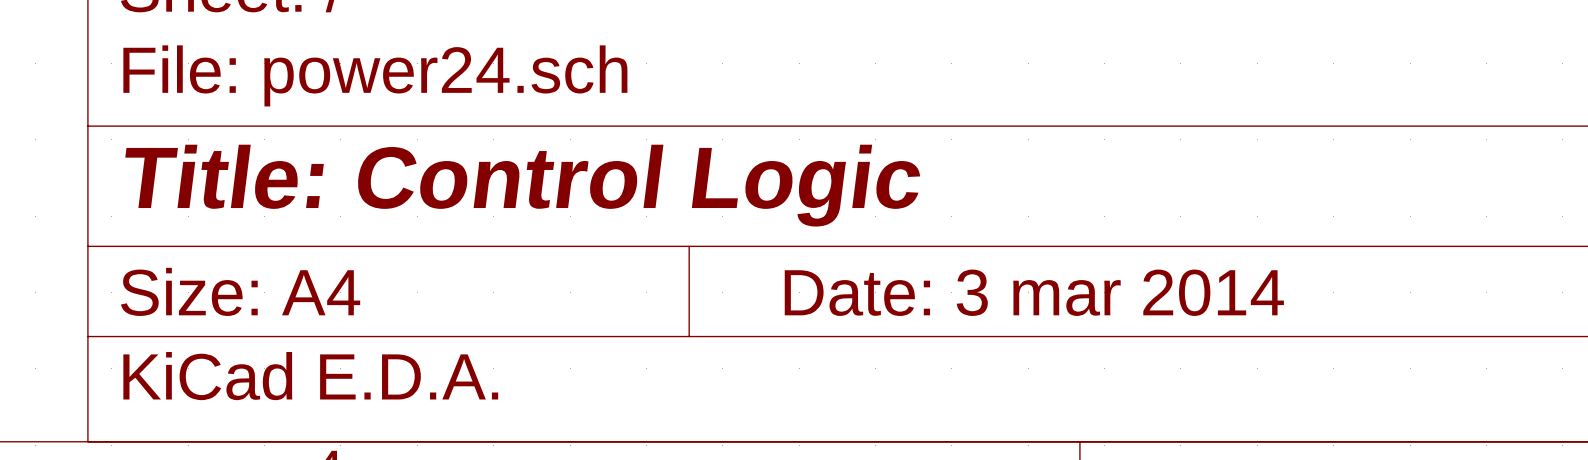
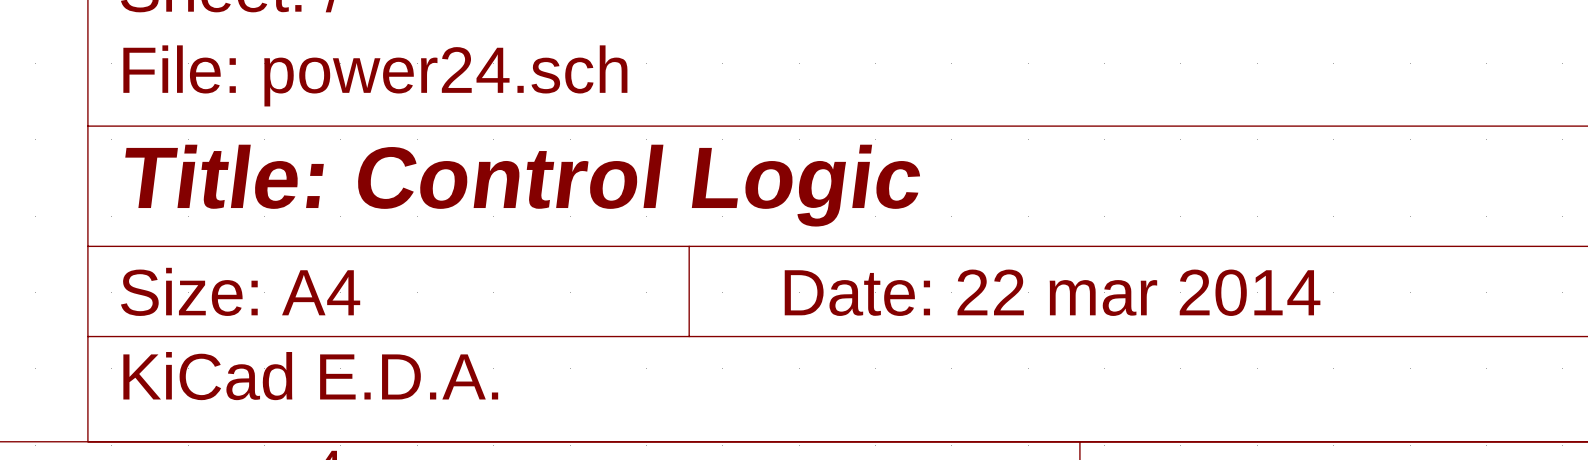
title block: Date: 3 mar 2014 (1034, 292) -> Date: 22 mar 2014 (1052, 292)

